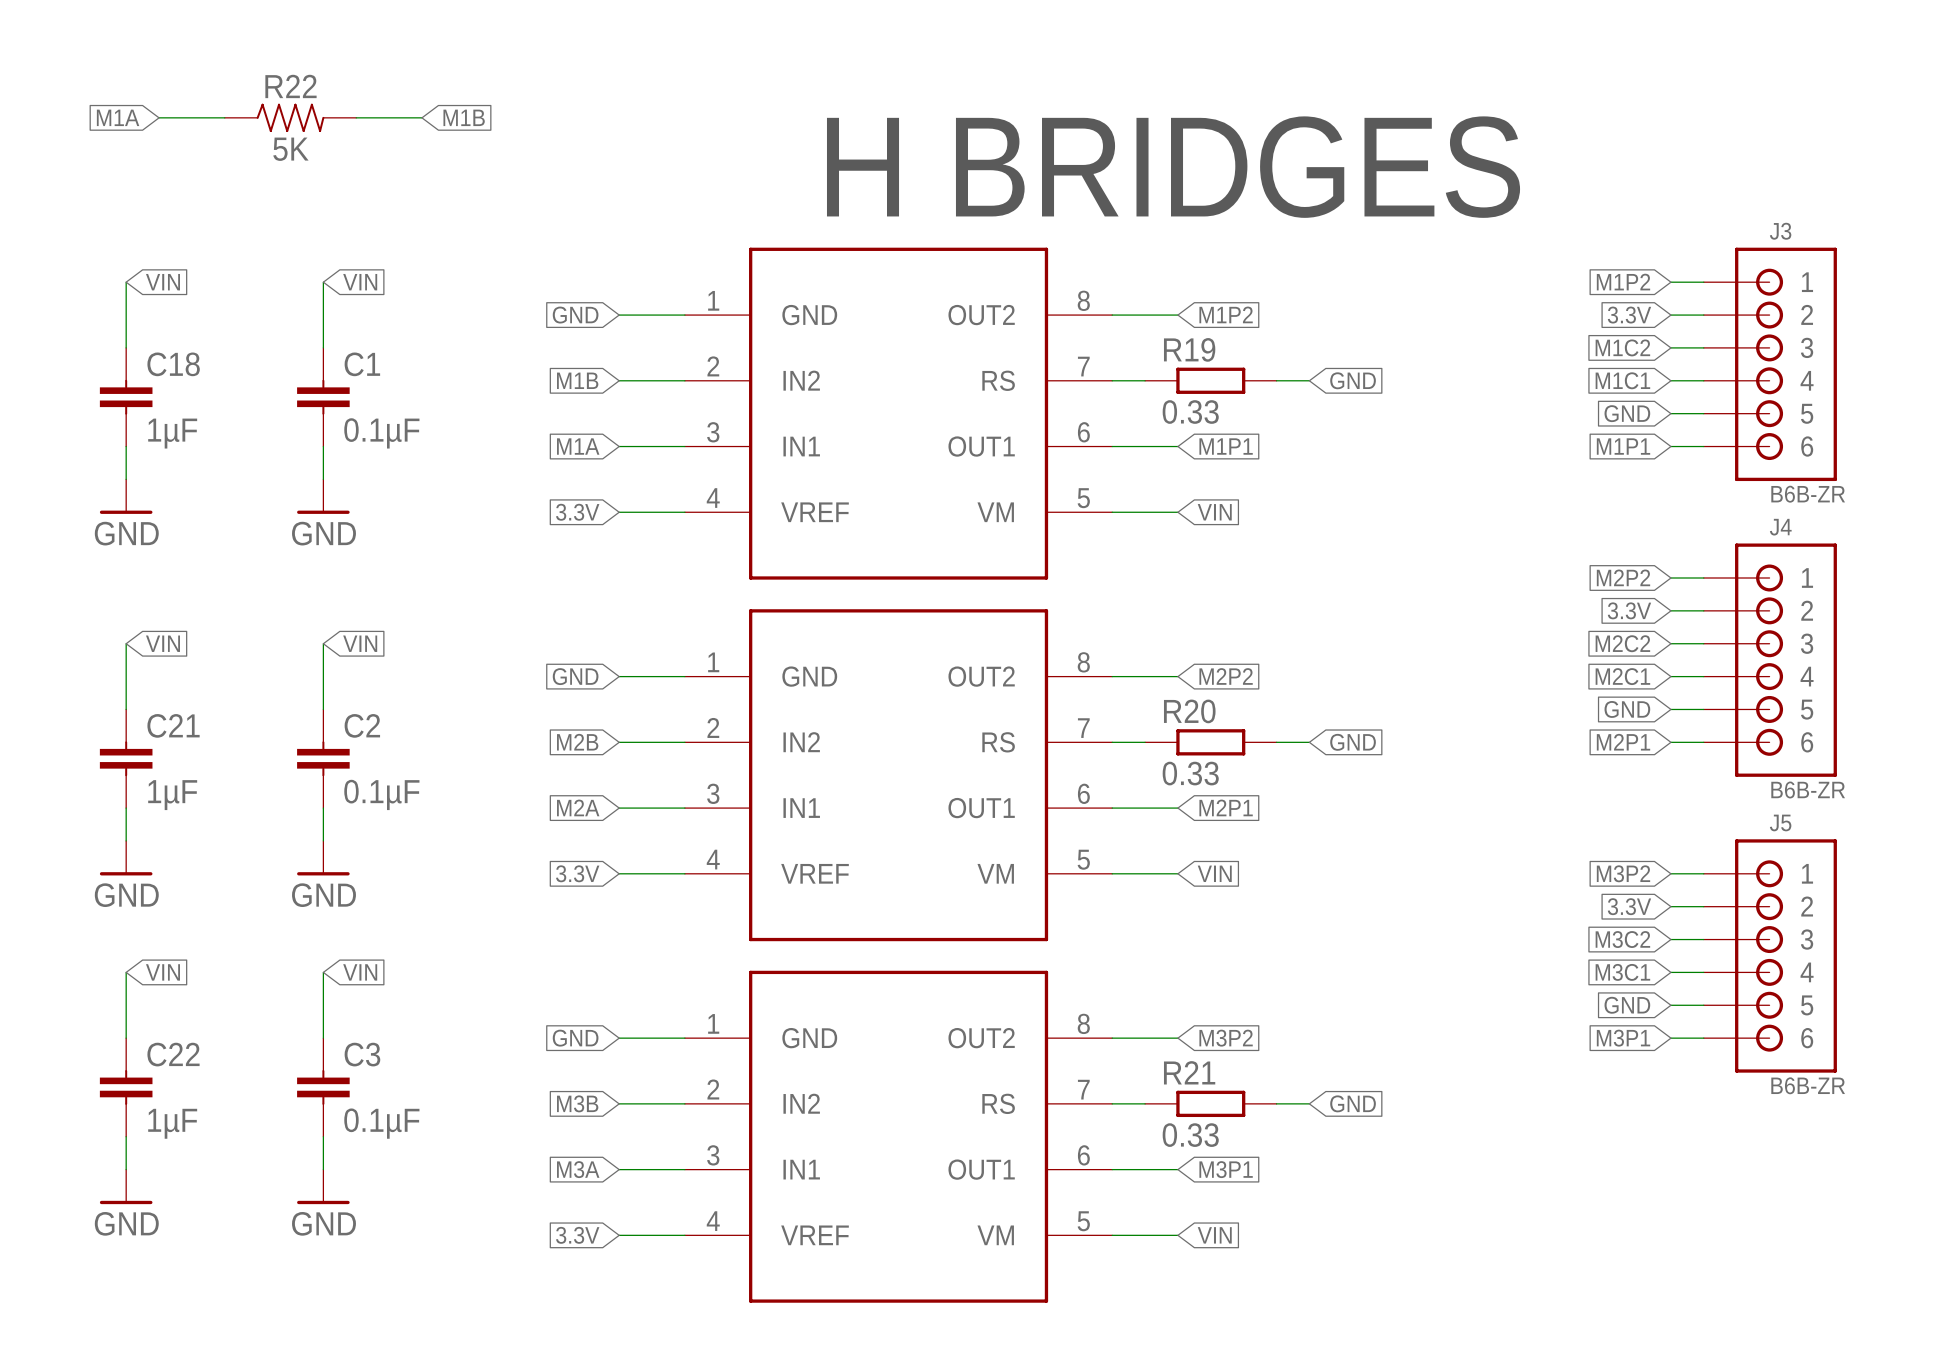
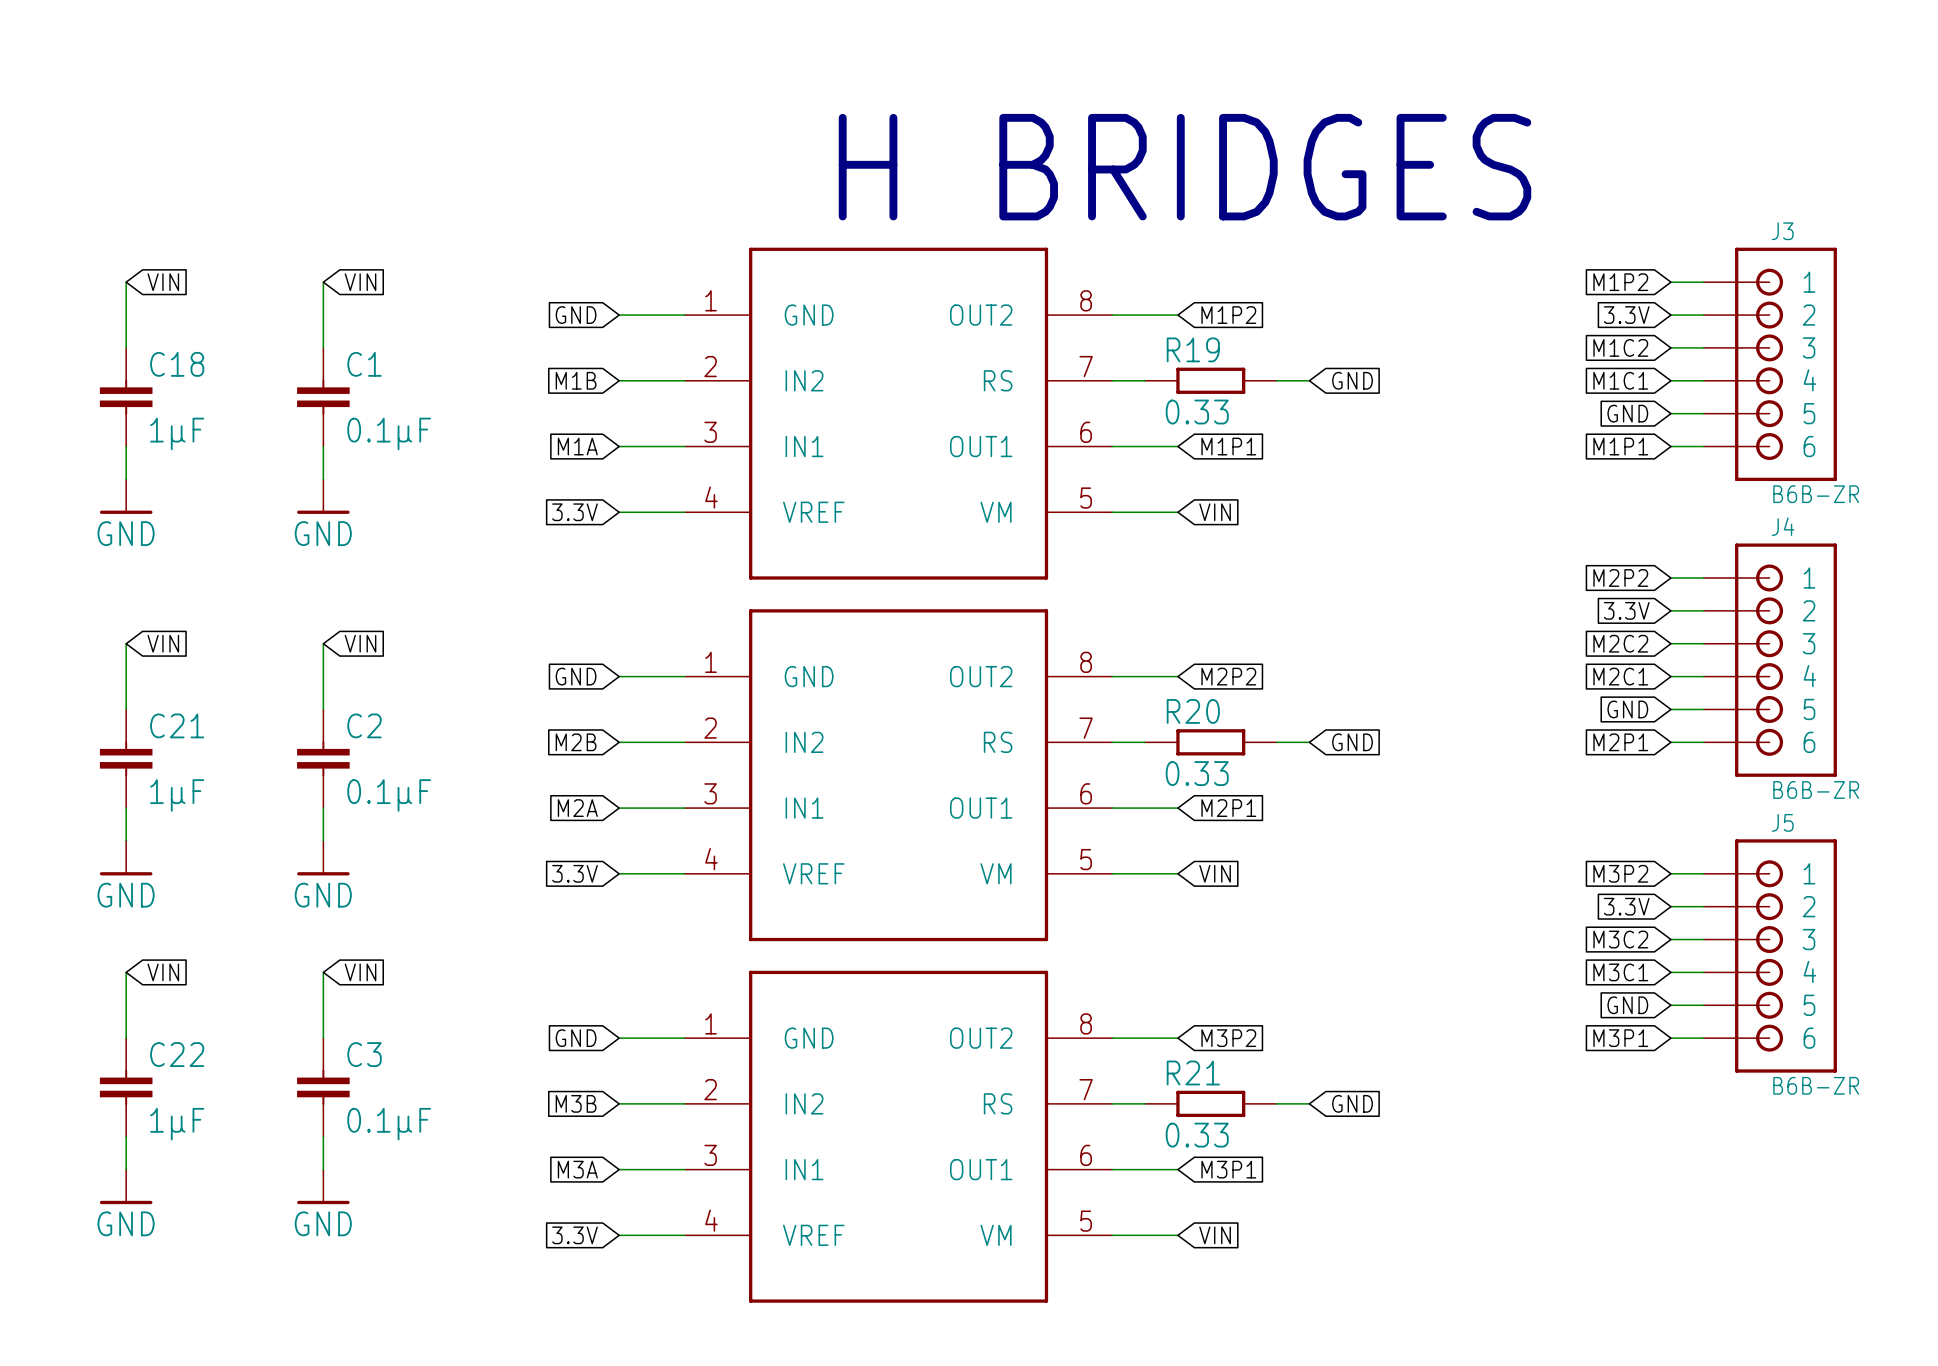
global label: M1A (118, 117) -> none
wire: (159, 117) (224, 117) -> none
R22: 5K (290, 117) -> none
wire: (356, 117) (421, 117) -> none
global label: M1B (464, 117) -> none

